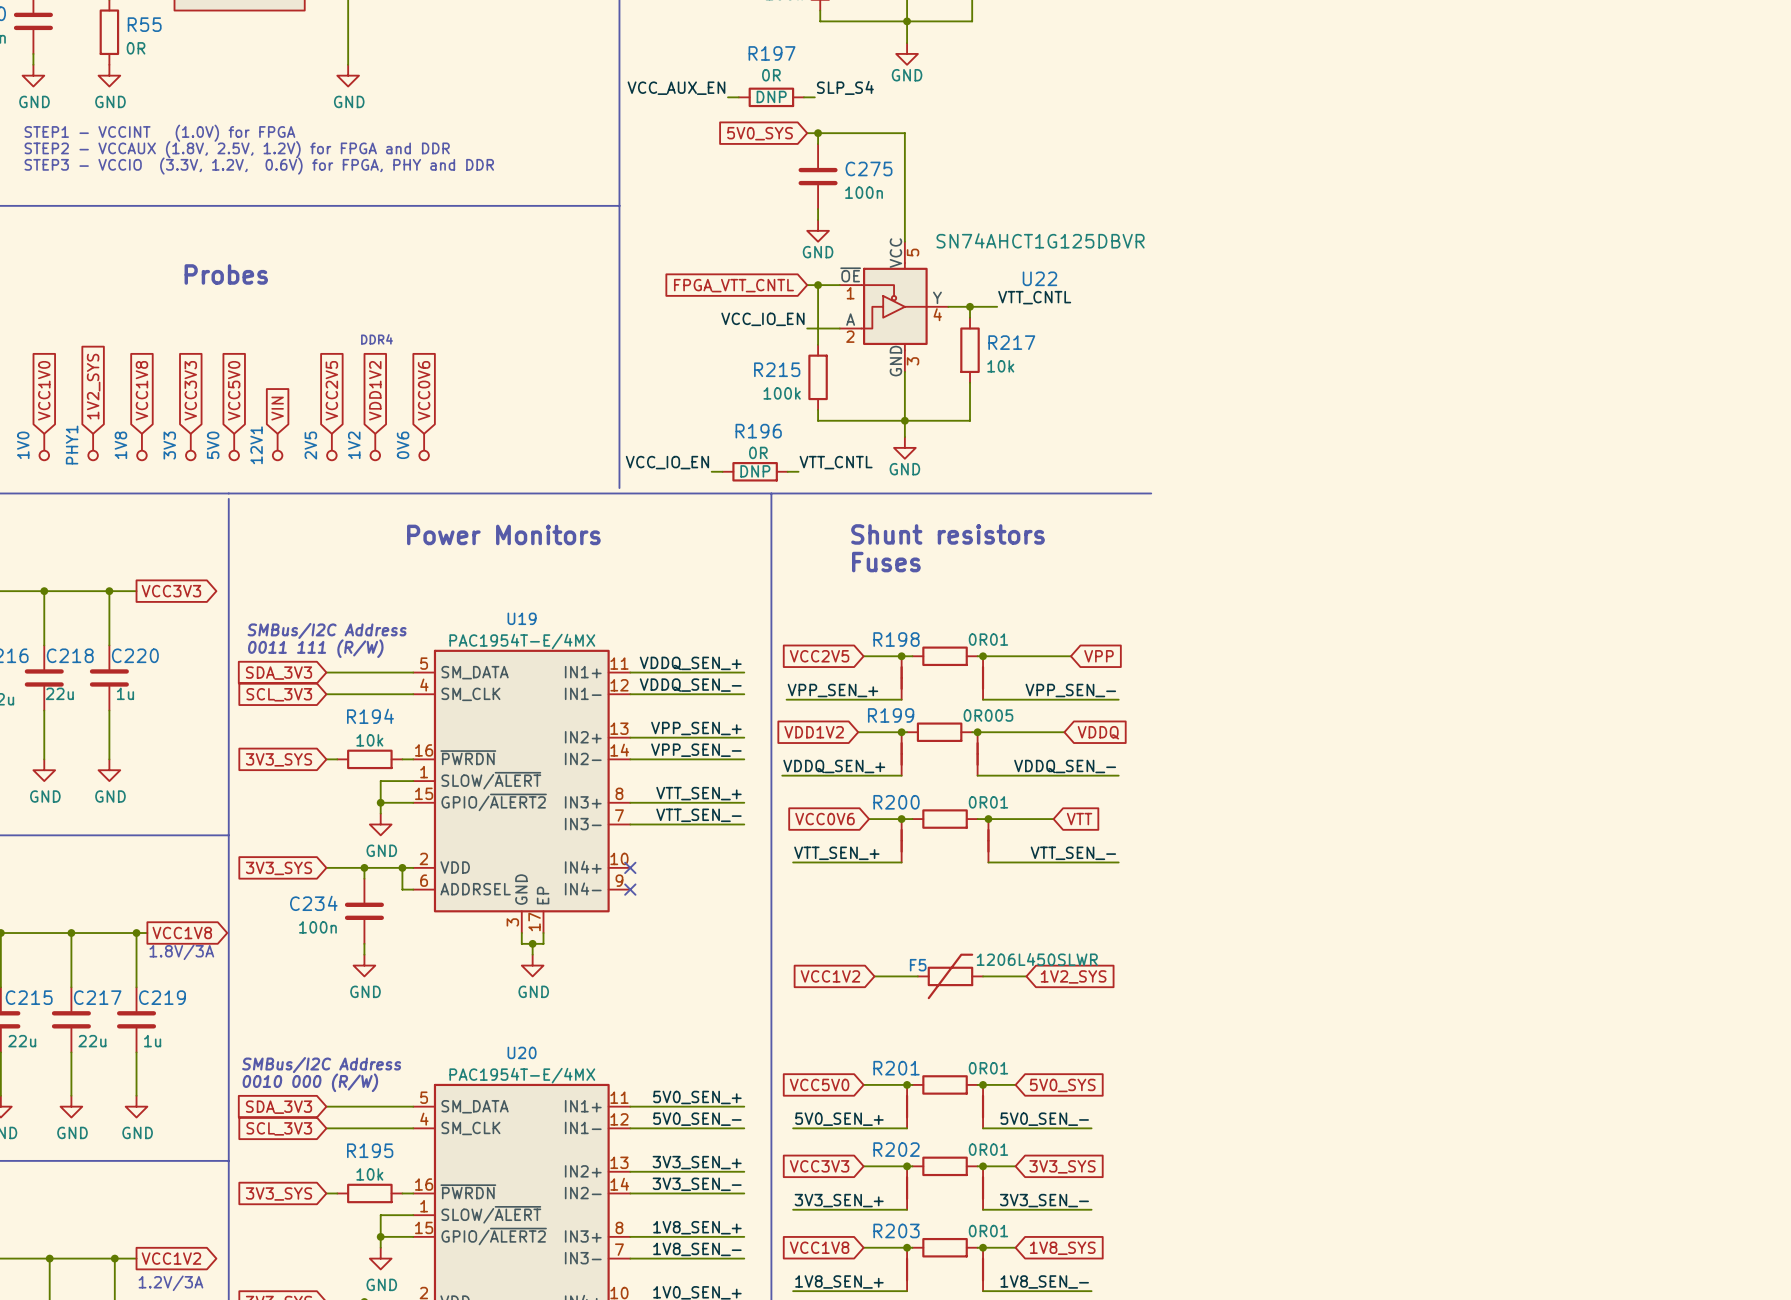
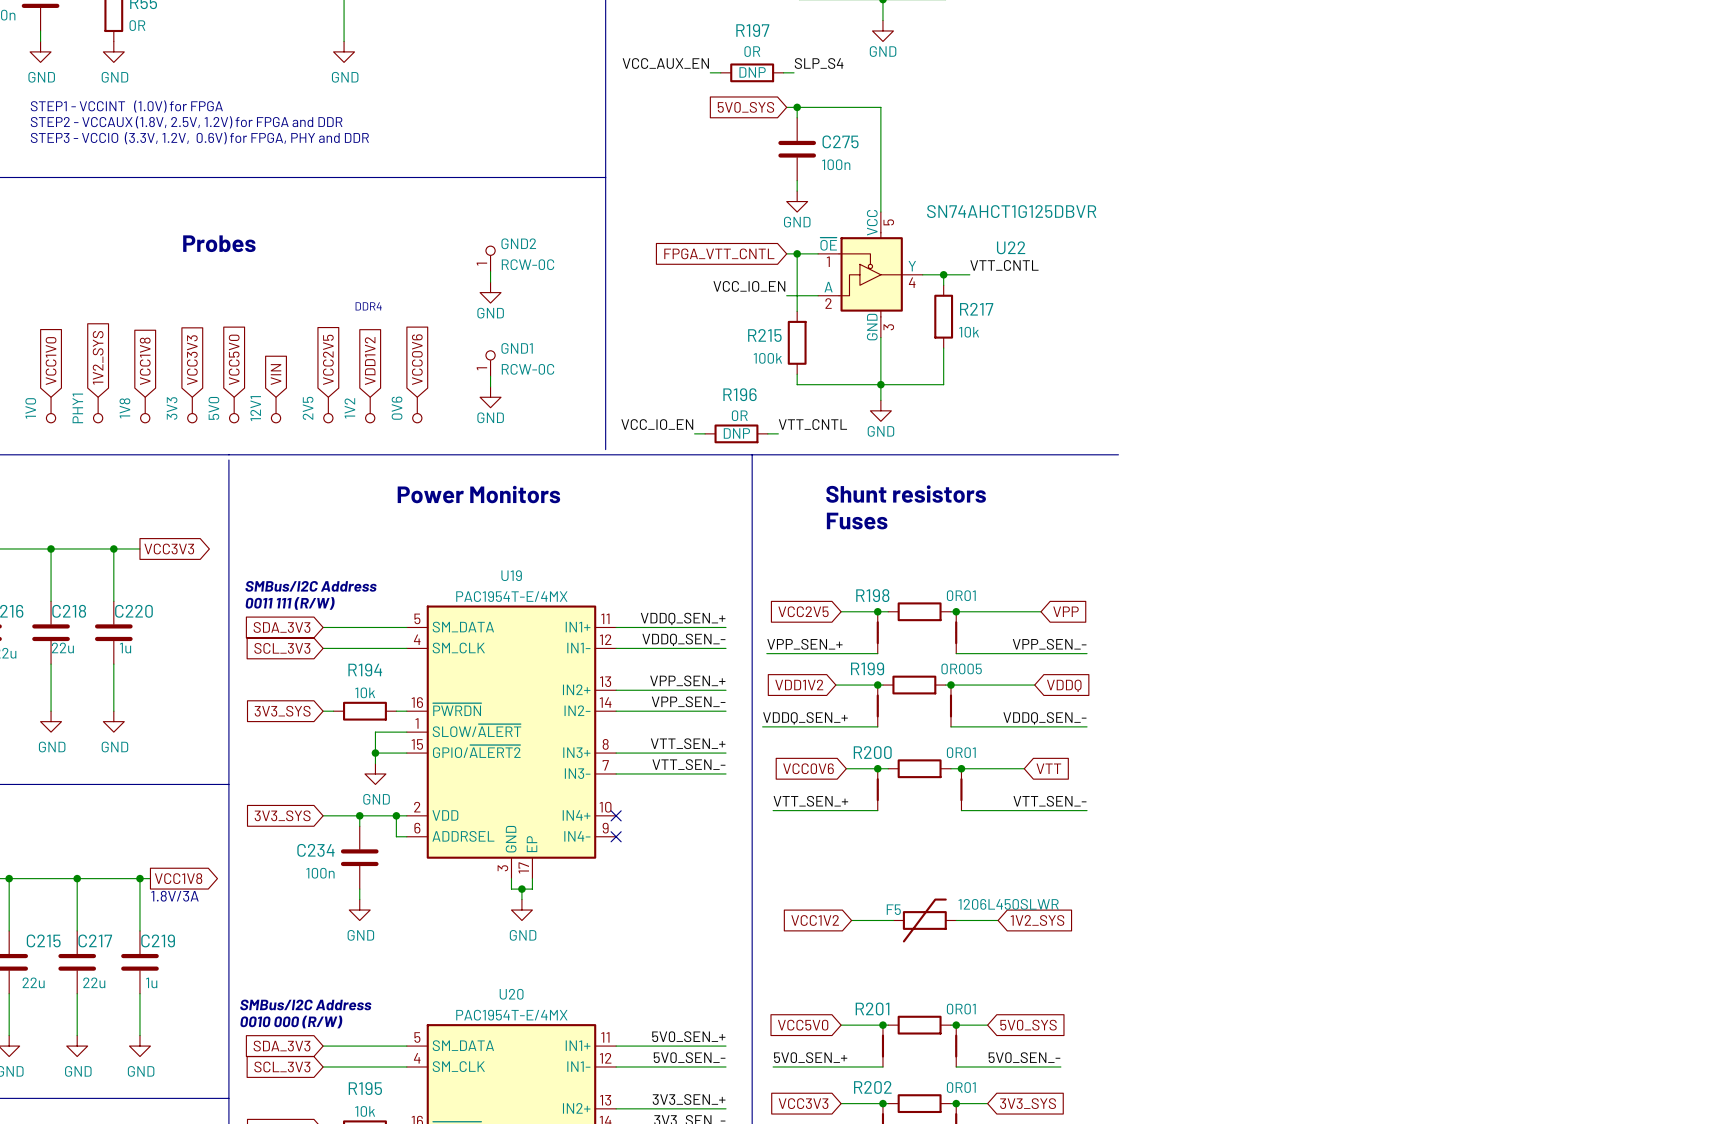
GND2: none -> RCW-0C (490, 258)
wire: none -> (490, 271) (490, 282)
power symbol: none -> GND (490, 292)
GND1: none -> RCW-0C (490, 363)
wire: none -> (490, 376) (490, 386)
power symbol: none -> GND (490, 397)

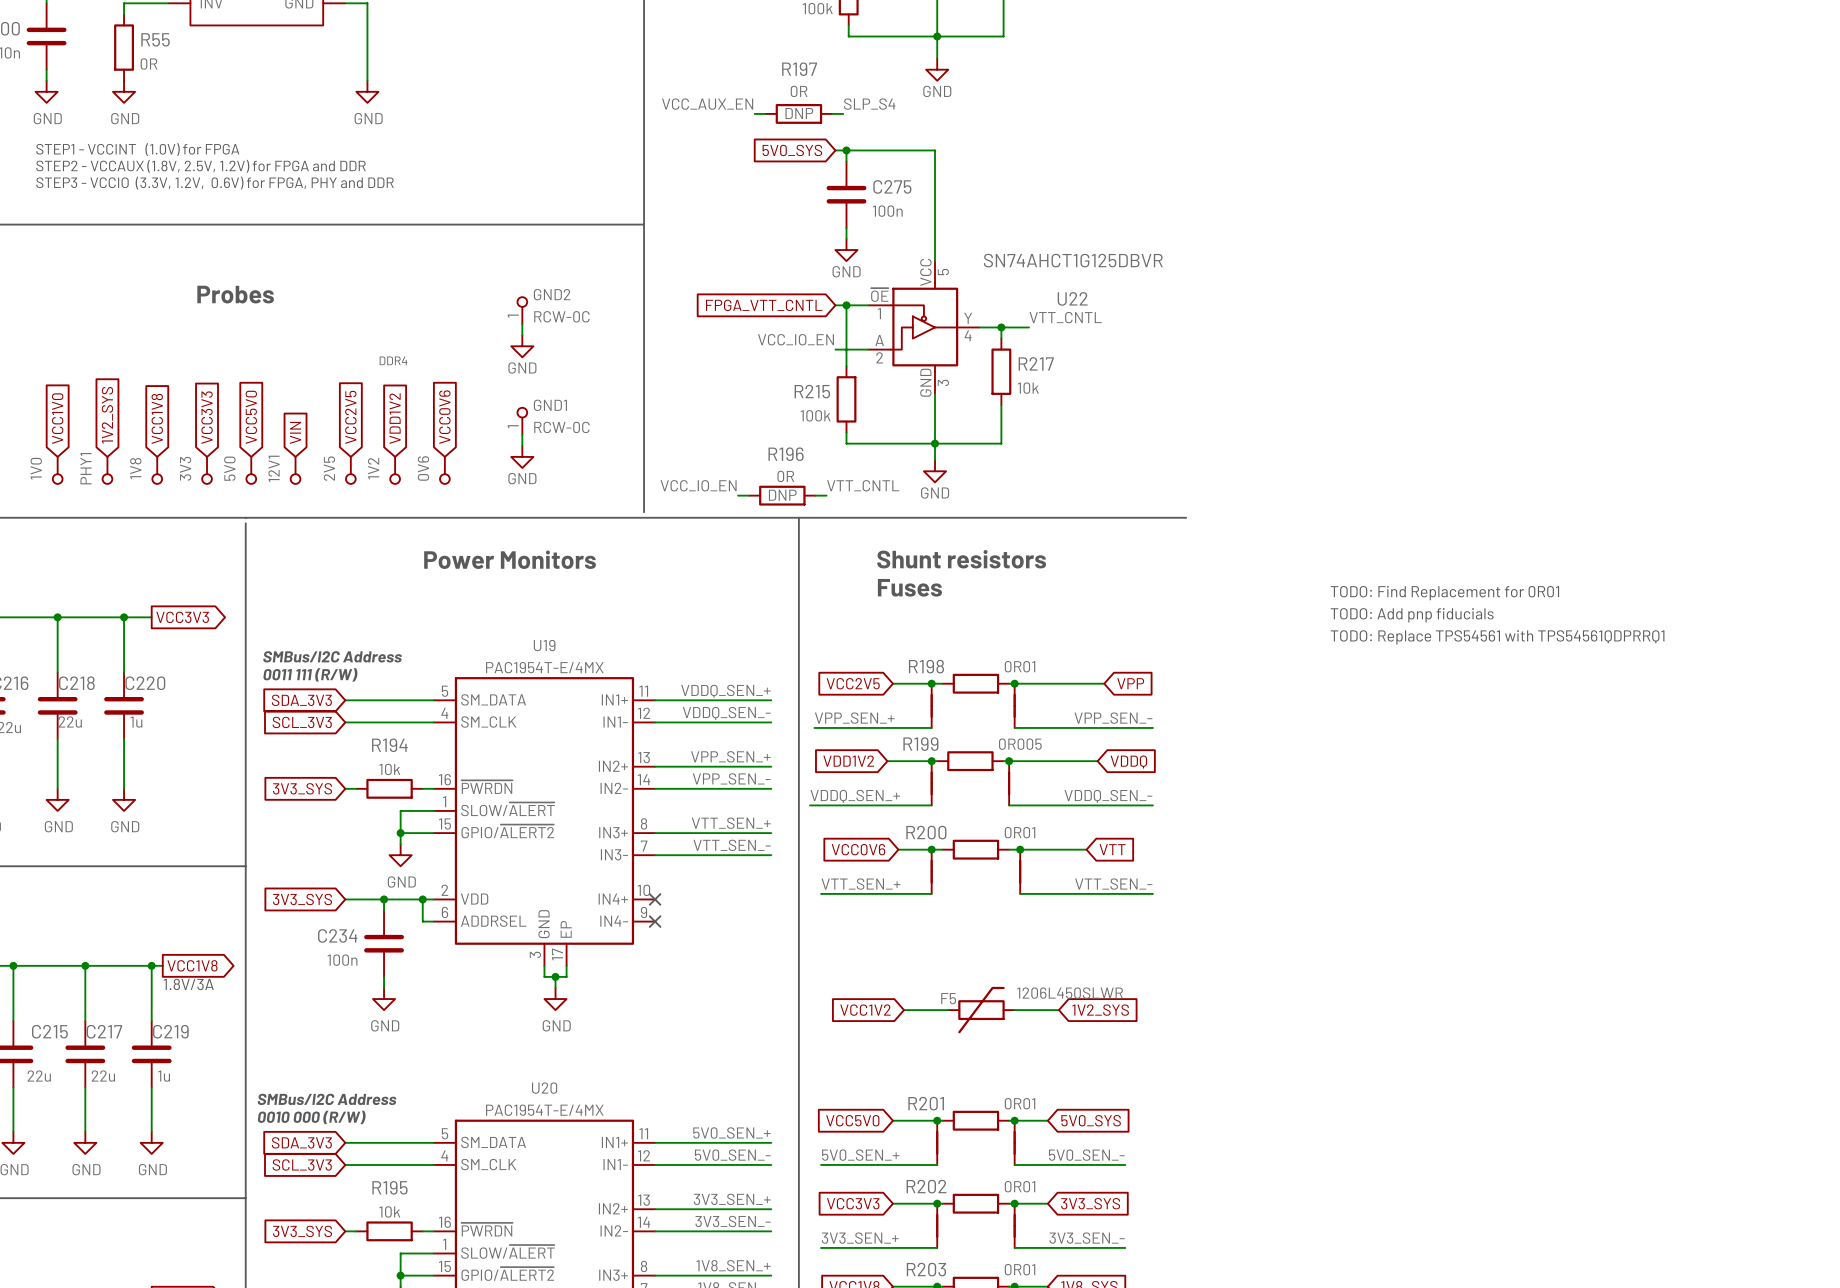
text: none -> TODO: Find Replacement for 0R01 (1444, 593)
text: none -> TODO: Add pnp fiducials (1412, 615)
text: none -> TODO: Replace TPS54561 with TPS54561QDPRRQ1 (1497, 637)

